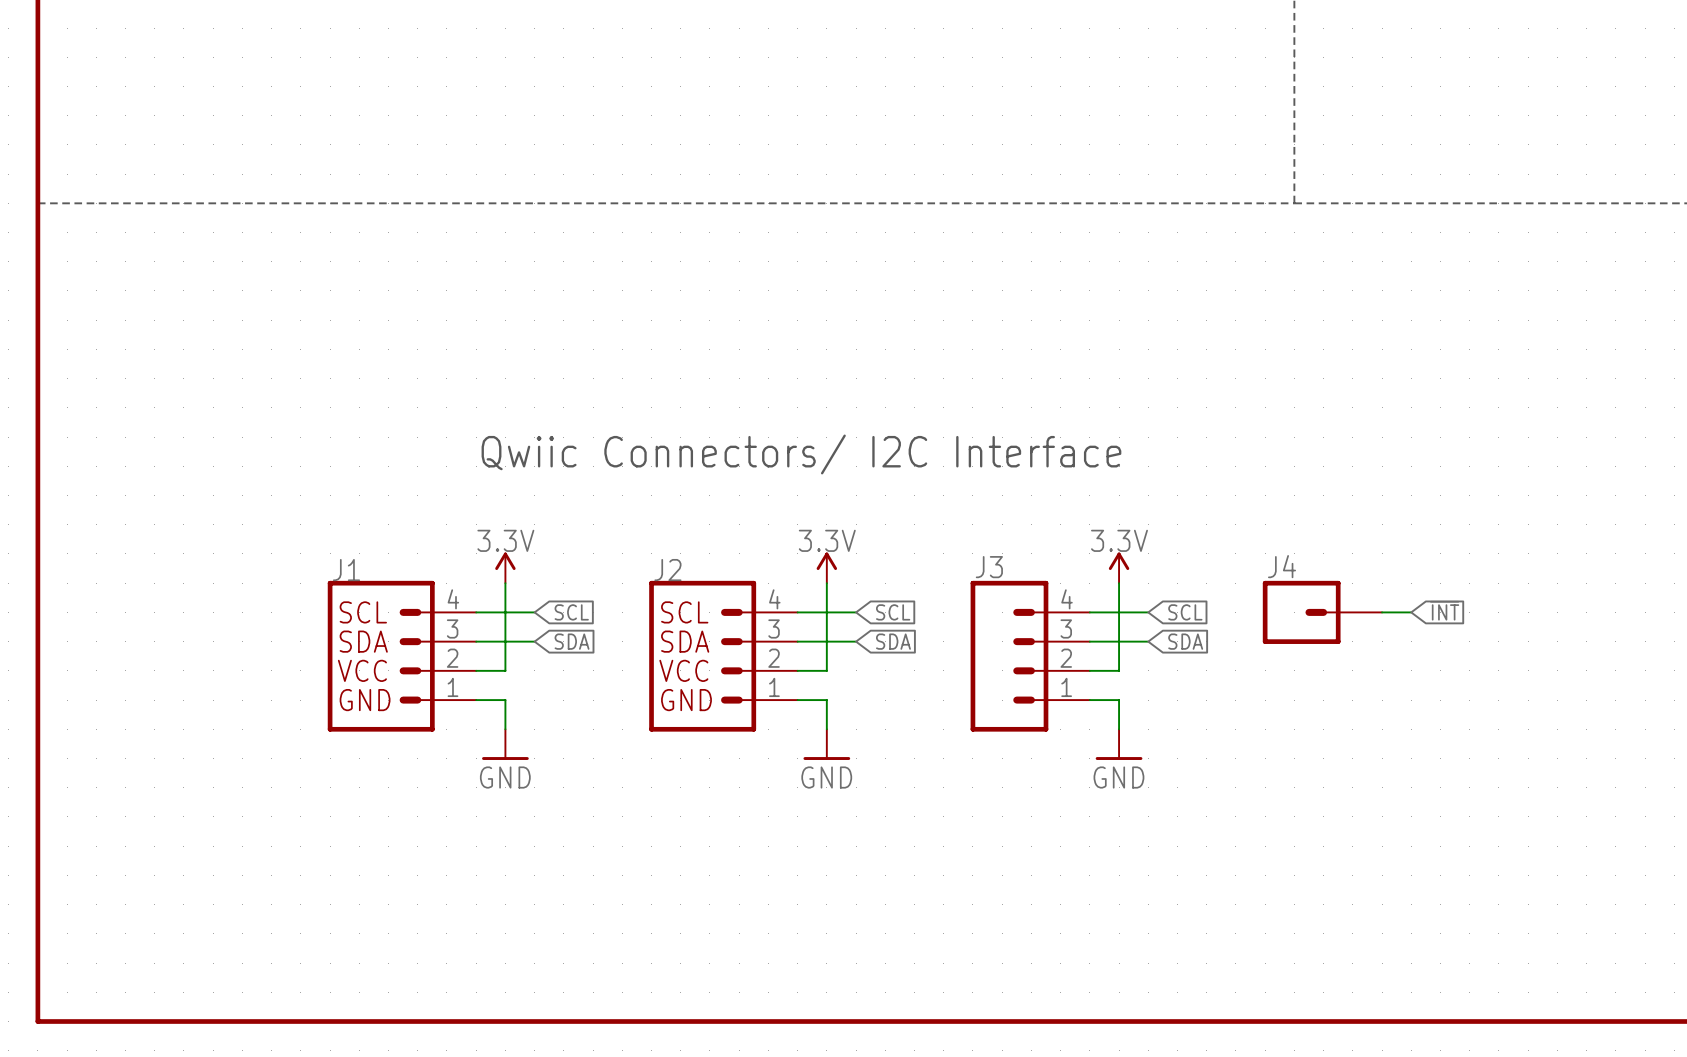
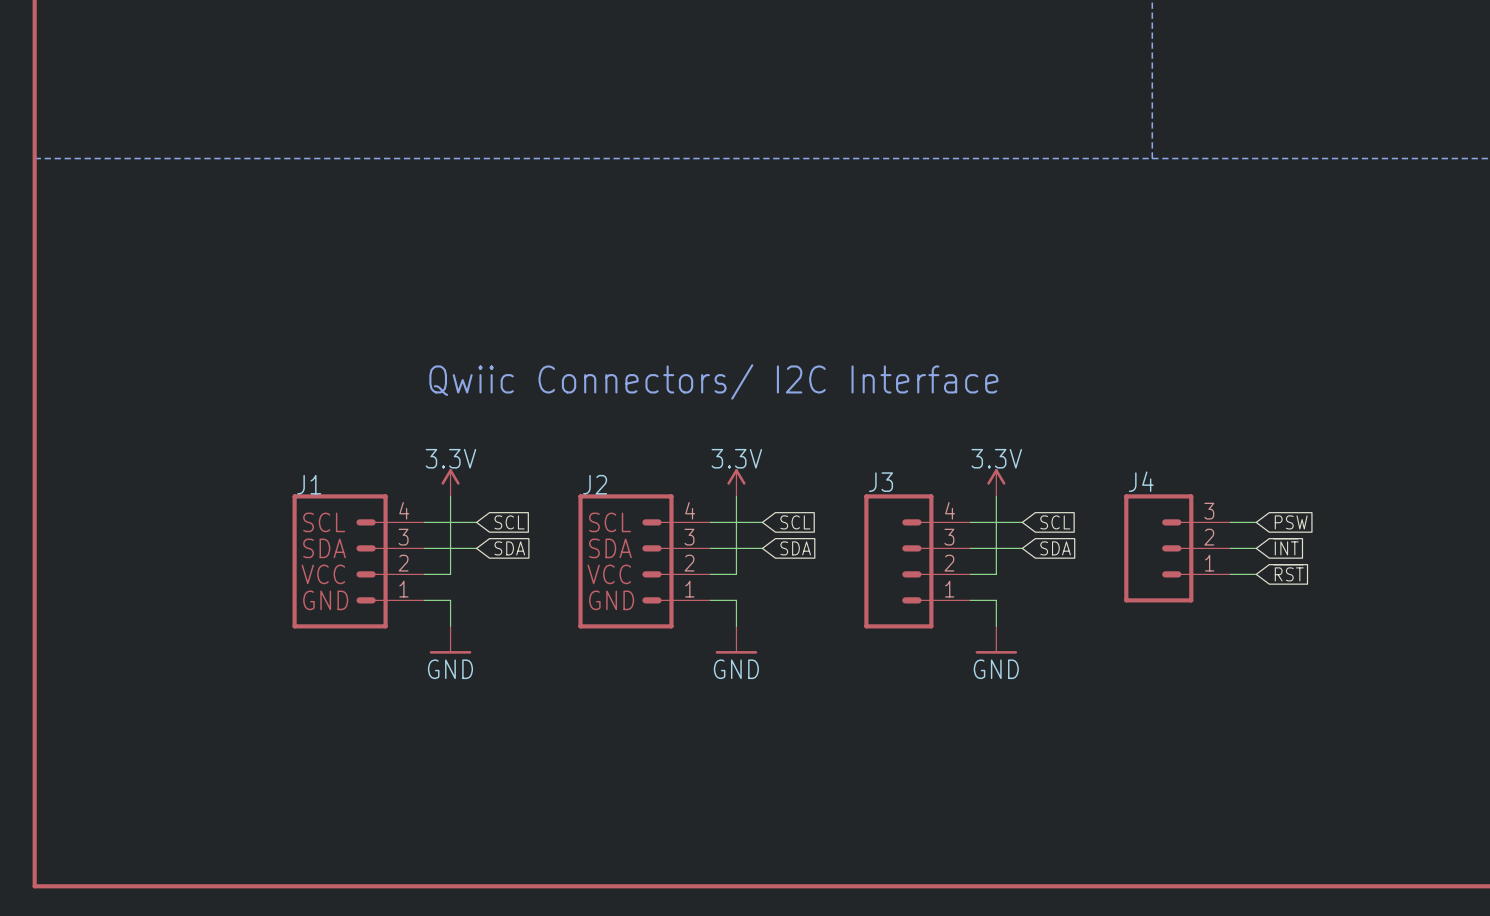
J4 symbol: [1262, 580, 1383, 644] -> [1124, 494, 1231, 603]
global label: ~{INT} (1444, 610) -> PSW (1291, 522)
global label: none -> ~{INT} (1285, 546)
wire: none -> (1230, 548) (1256, 548)
global label: none -> ~{RST} (1288, 572)
wire: none -> (1230, 574) (1256, 574)

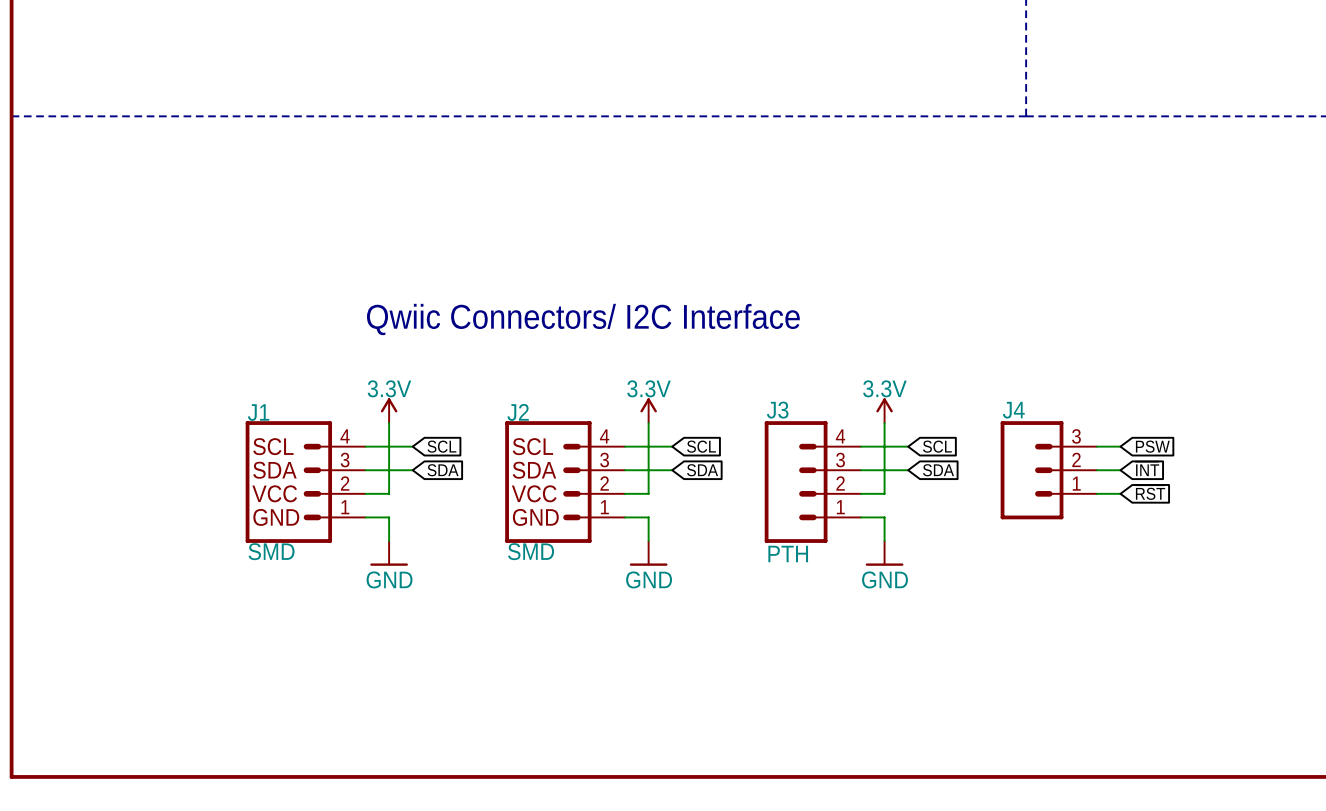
J1 value: none -> SMD (271, 551)
J2 value: none -> SMD (531, 551)
J3 value: none -> PTH (788, 554)

